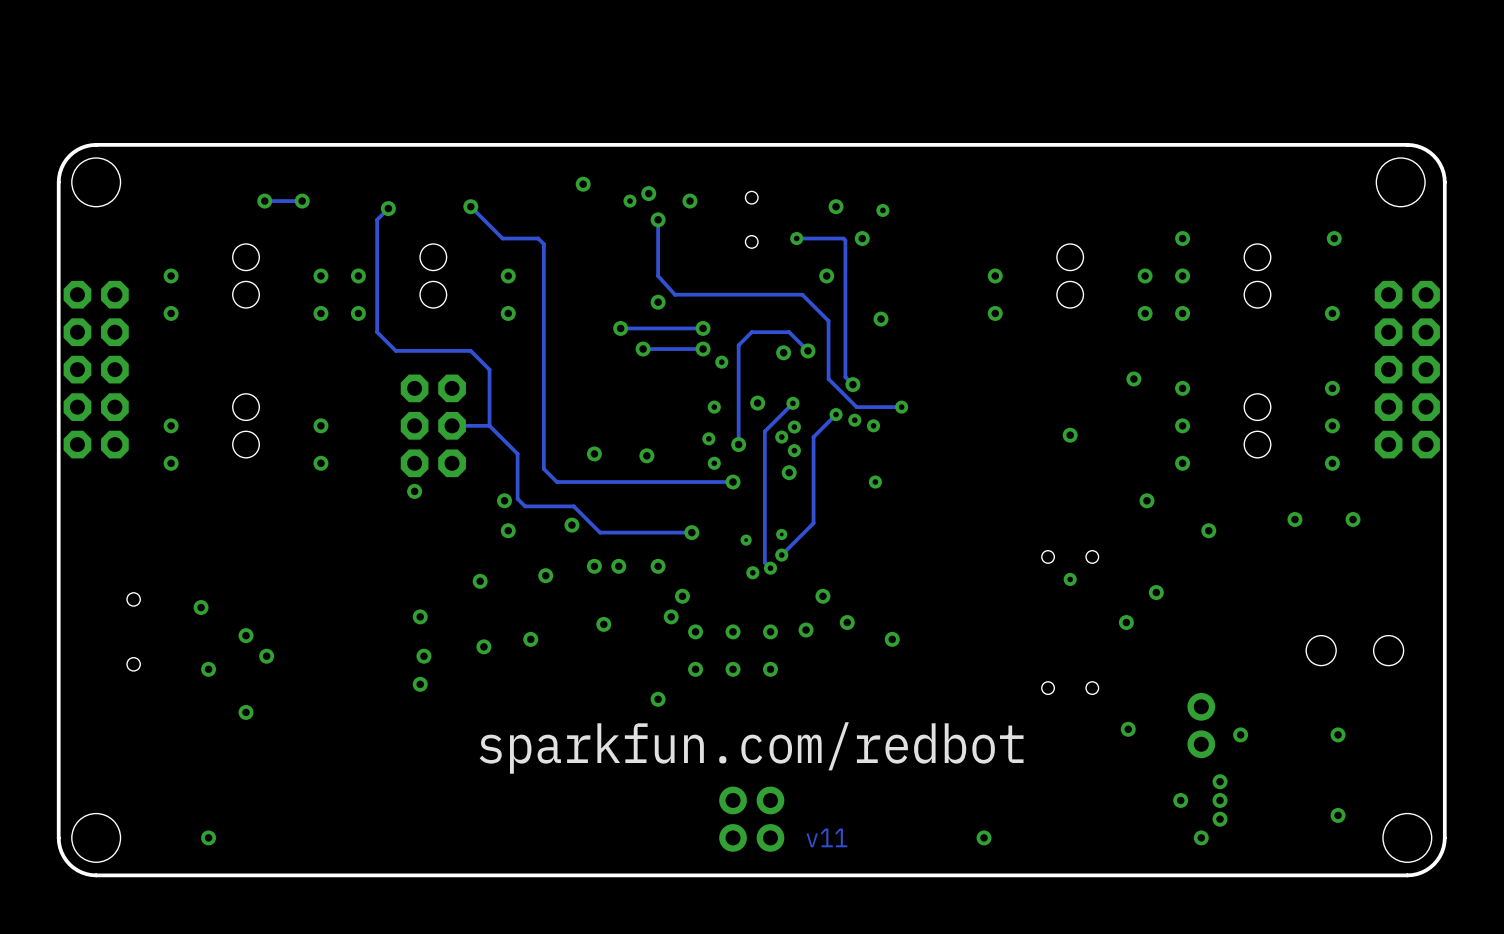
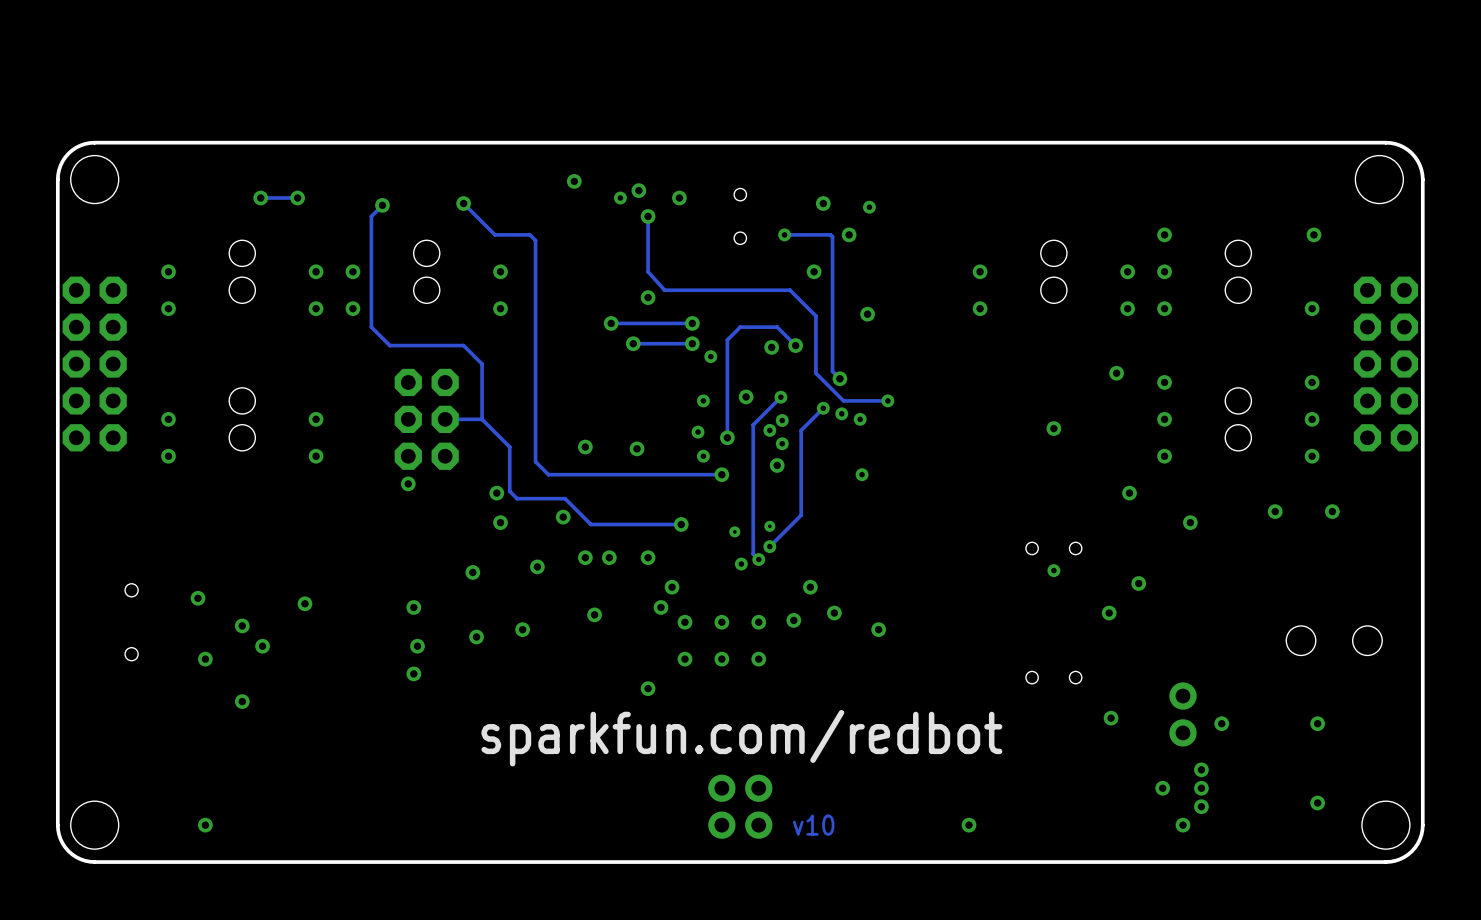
via: none -> (304, 603)
text: v11 (826, 837) -> v10 (813, 825)

